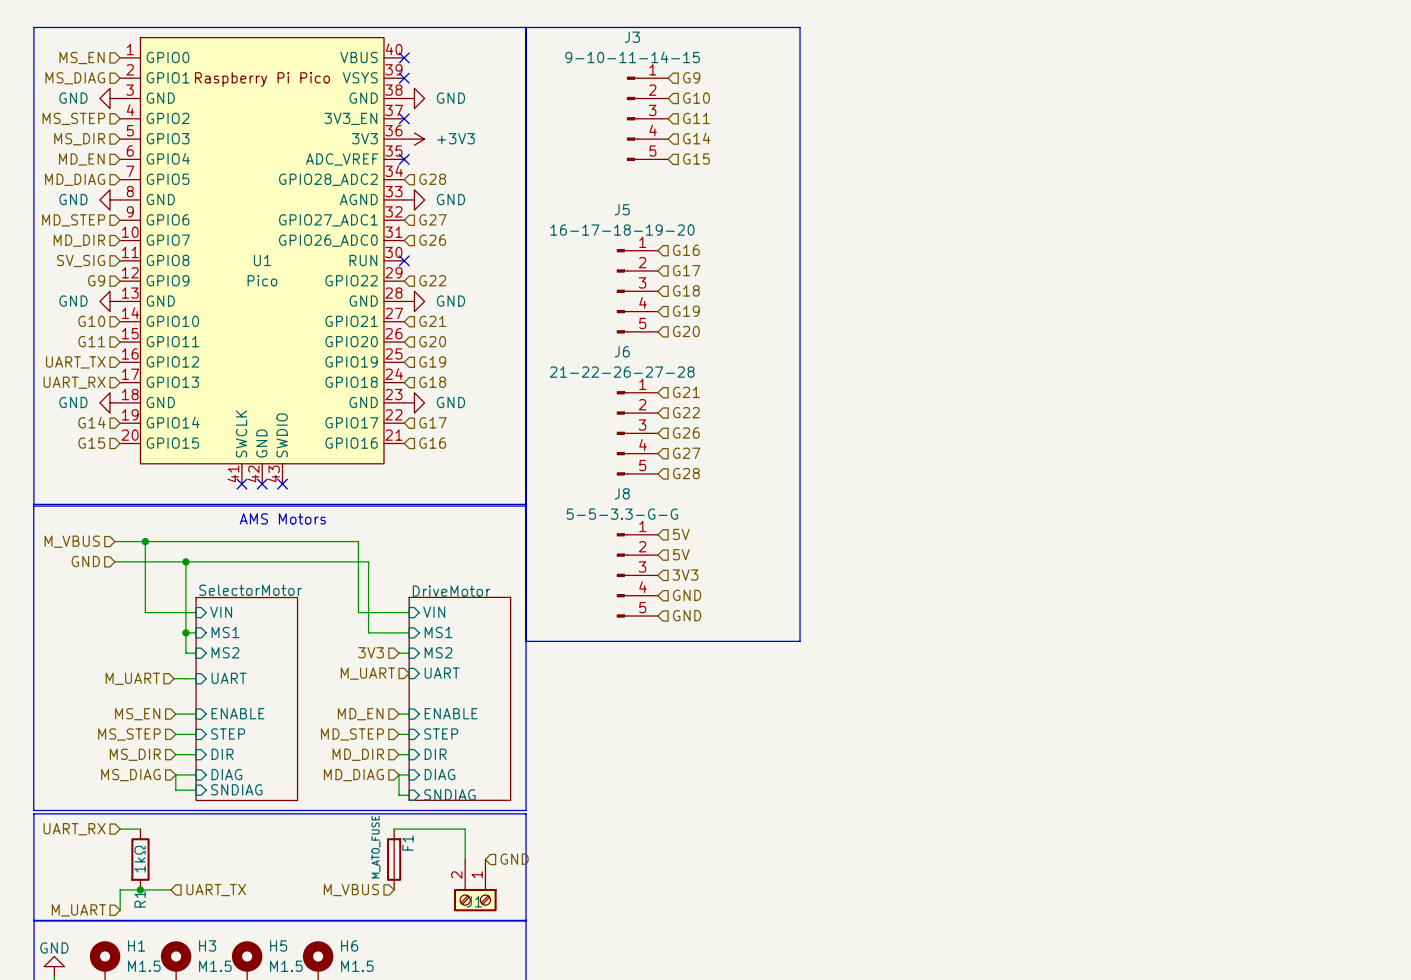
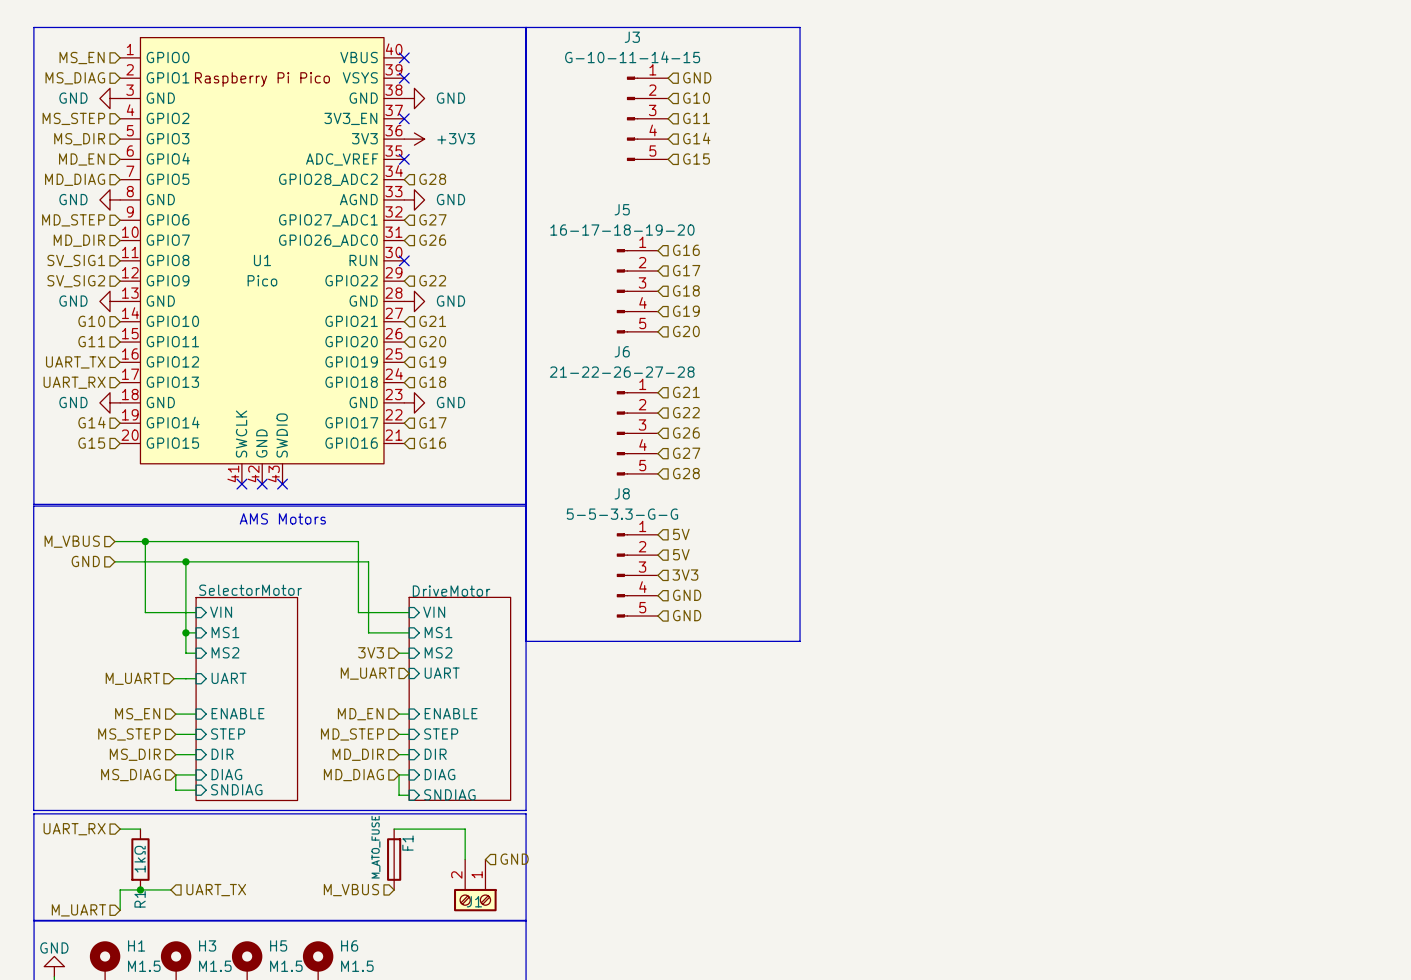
J3 value: 9-10-11-14-15 (632, 57) -> G-10-11-14-15 (632, 57)
hierarchical label: G9 (691, 77) -> GND (697, 77)
hierarchical label: SV_SIG (81, 260) -> SV_SIG1 (76, 260)
hierarchical label: G9 (96, 280) -> SV_SIG2 (76, 281)

